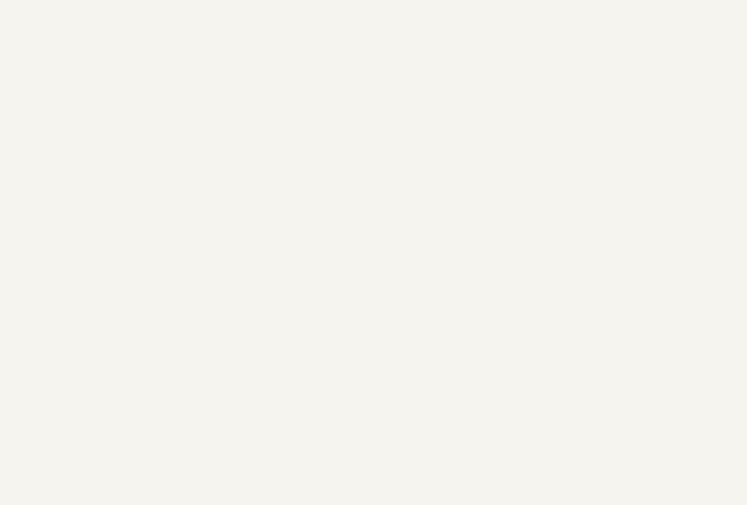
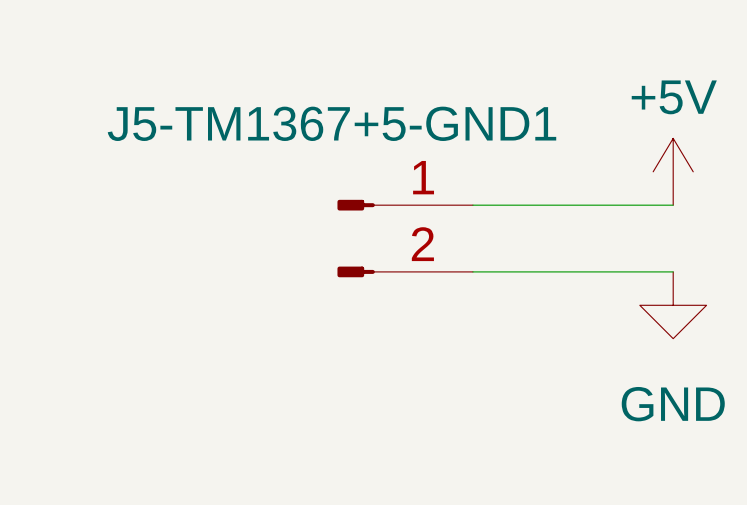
power symbol: none -> +5V (673, 171)
wire: none -> (472, 205) (673, 205)
J5-TM1367+5-GND1: none -> (405, 238)
wire: none -> (472, 271) (673, 271)
power symbol: none -> GND (673, 305)

